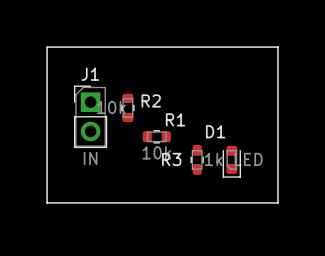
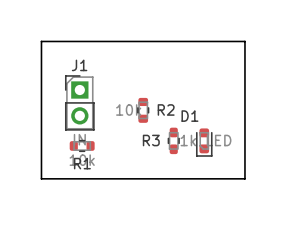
R2 name position: R2 (151, 100) -> R2 (166, 109)
R2 position: (127, 107) -> (143, 110)
R1 name position: R1 (175, 119) -> R1 (82, 163)
R1 position: (156, 136) -> (82, 145)

